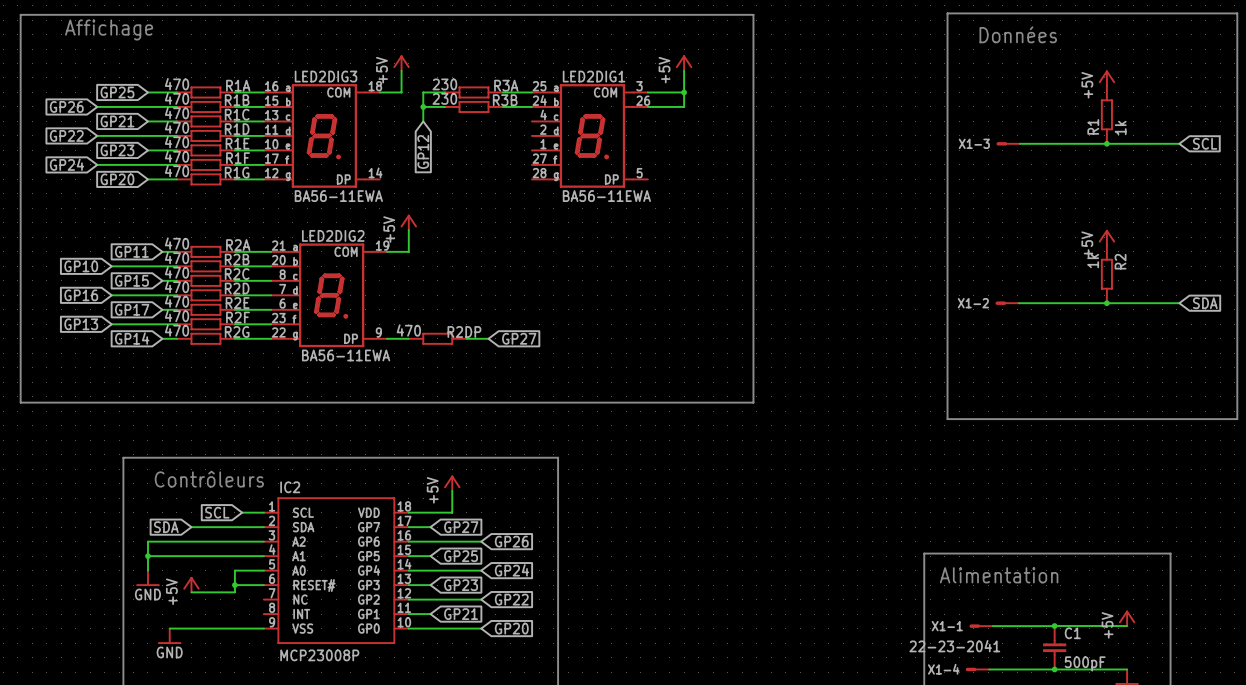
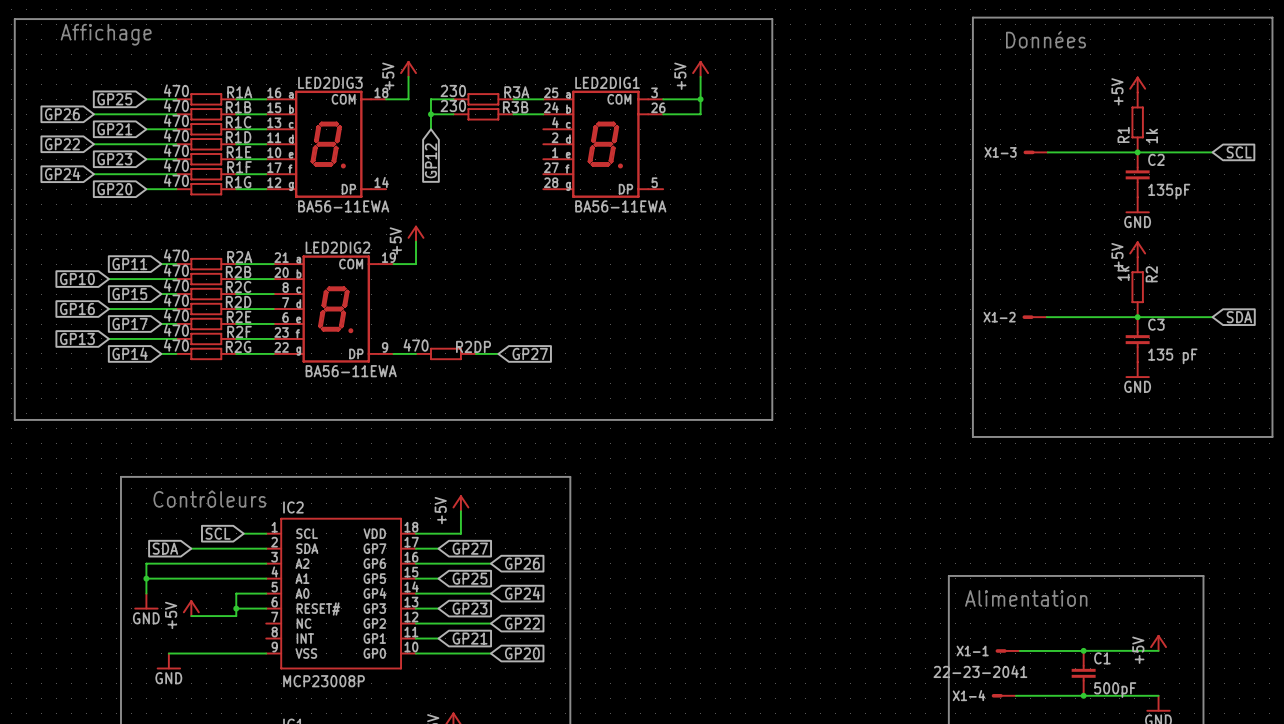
C2: none -> 135pF (1137, 174)
power symbol: none -> GND (1137, 205)
C3: none -> 135 pF (1137, 339)
power symbol: none -> GND (1137, 369)

